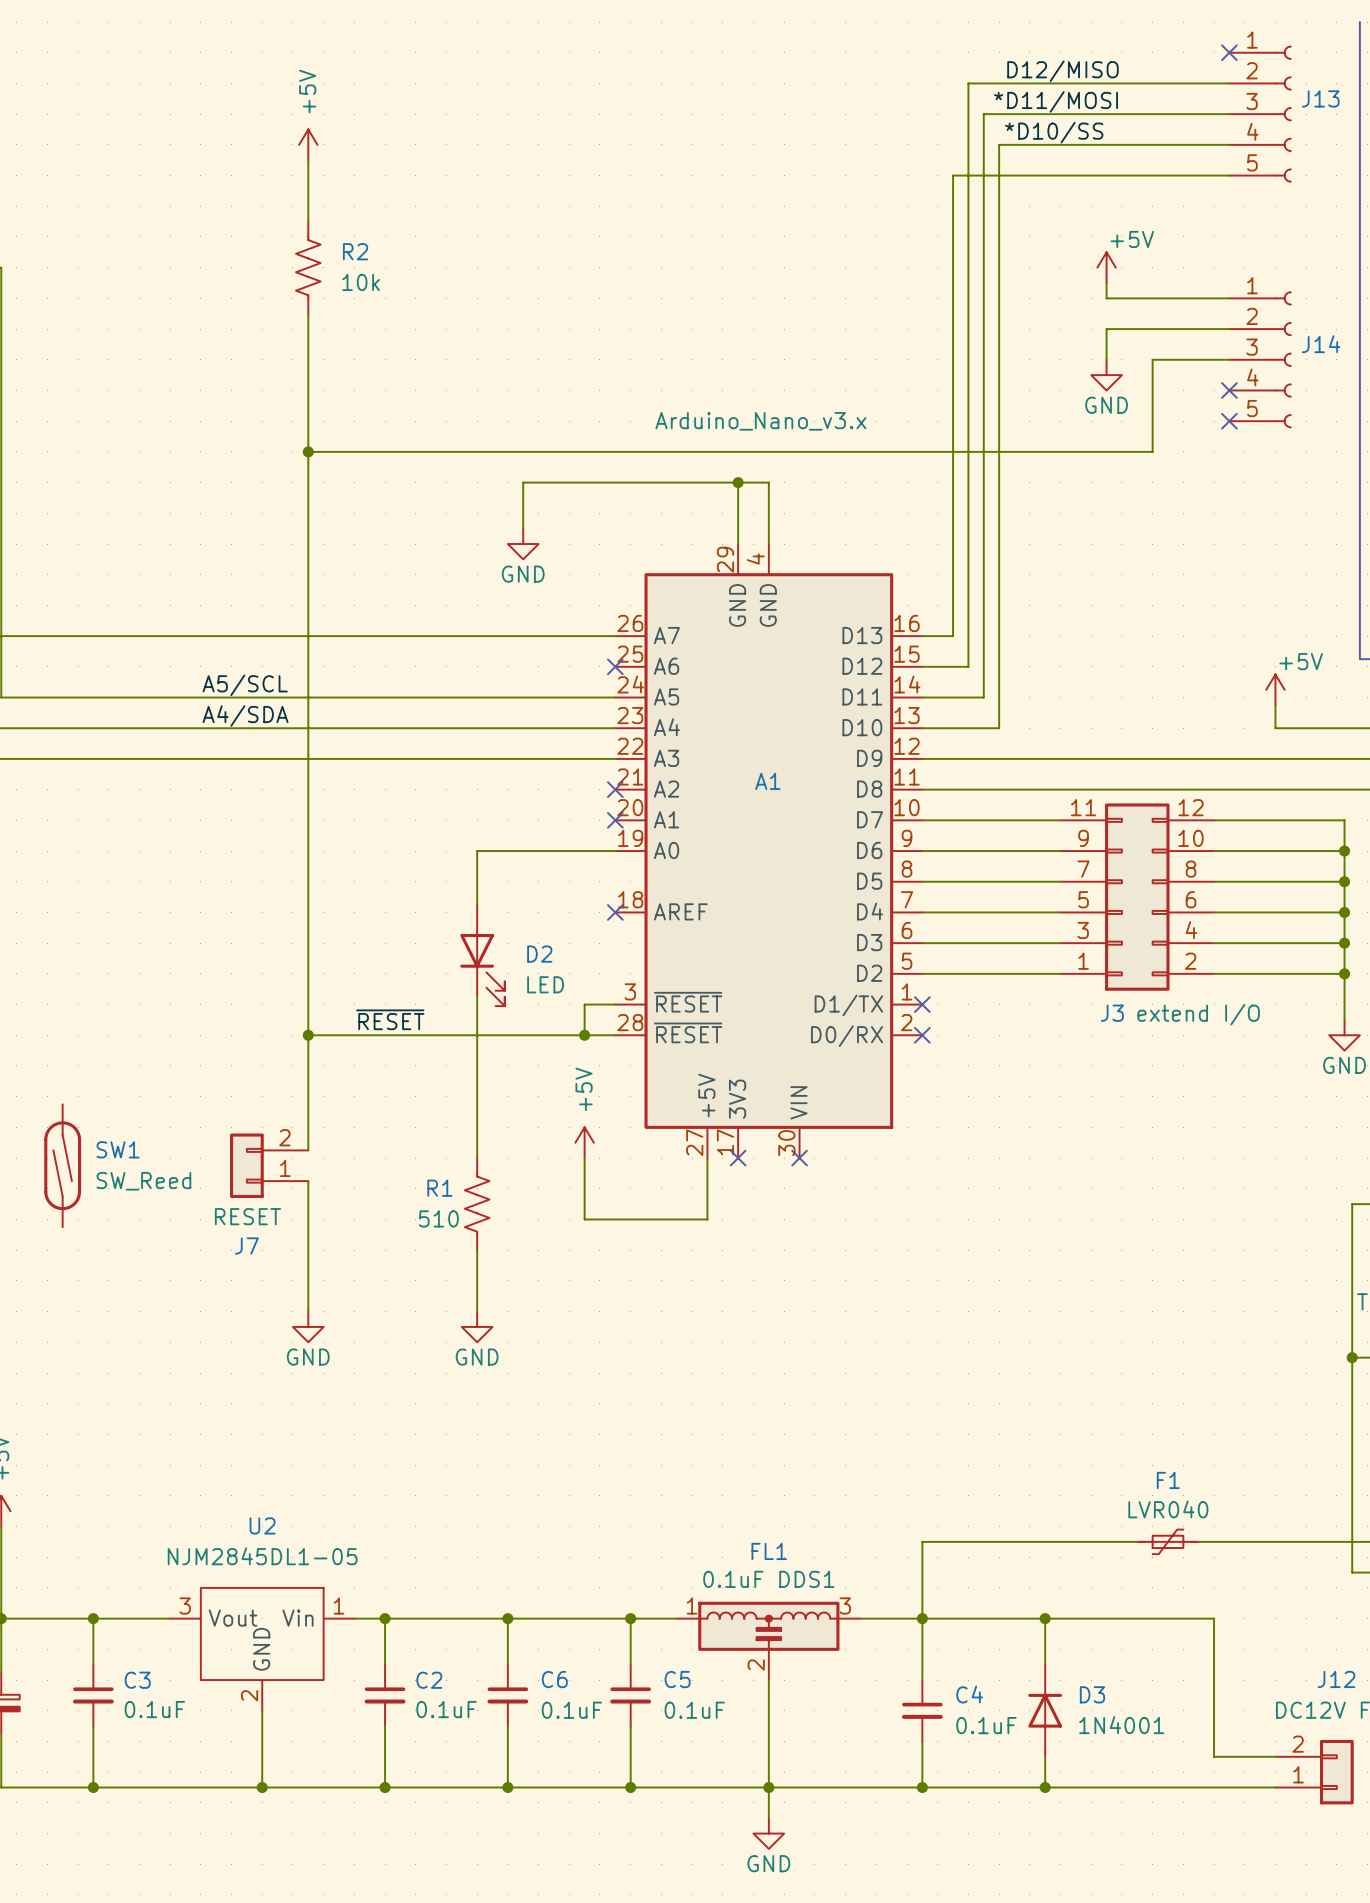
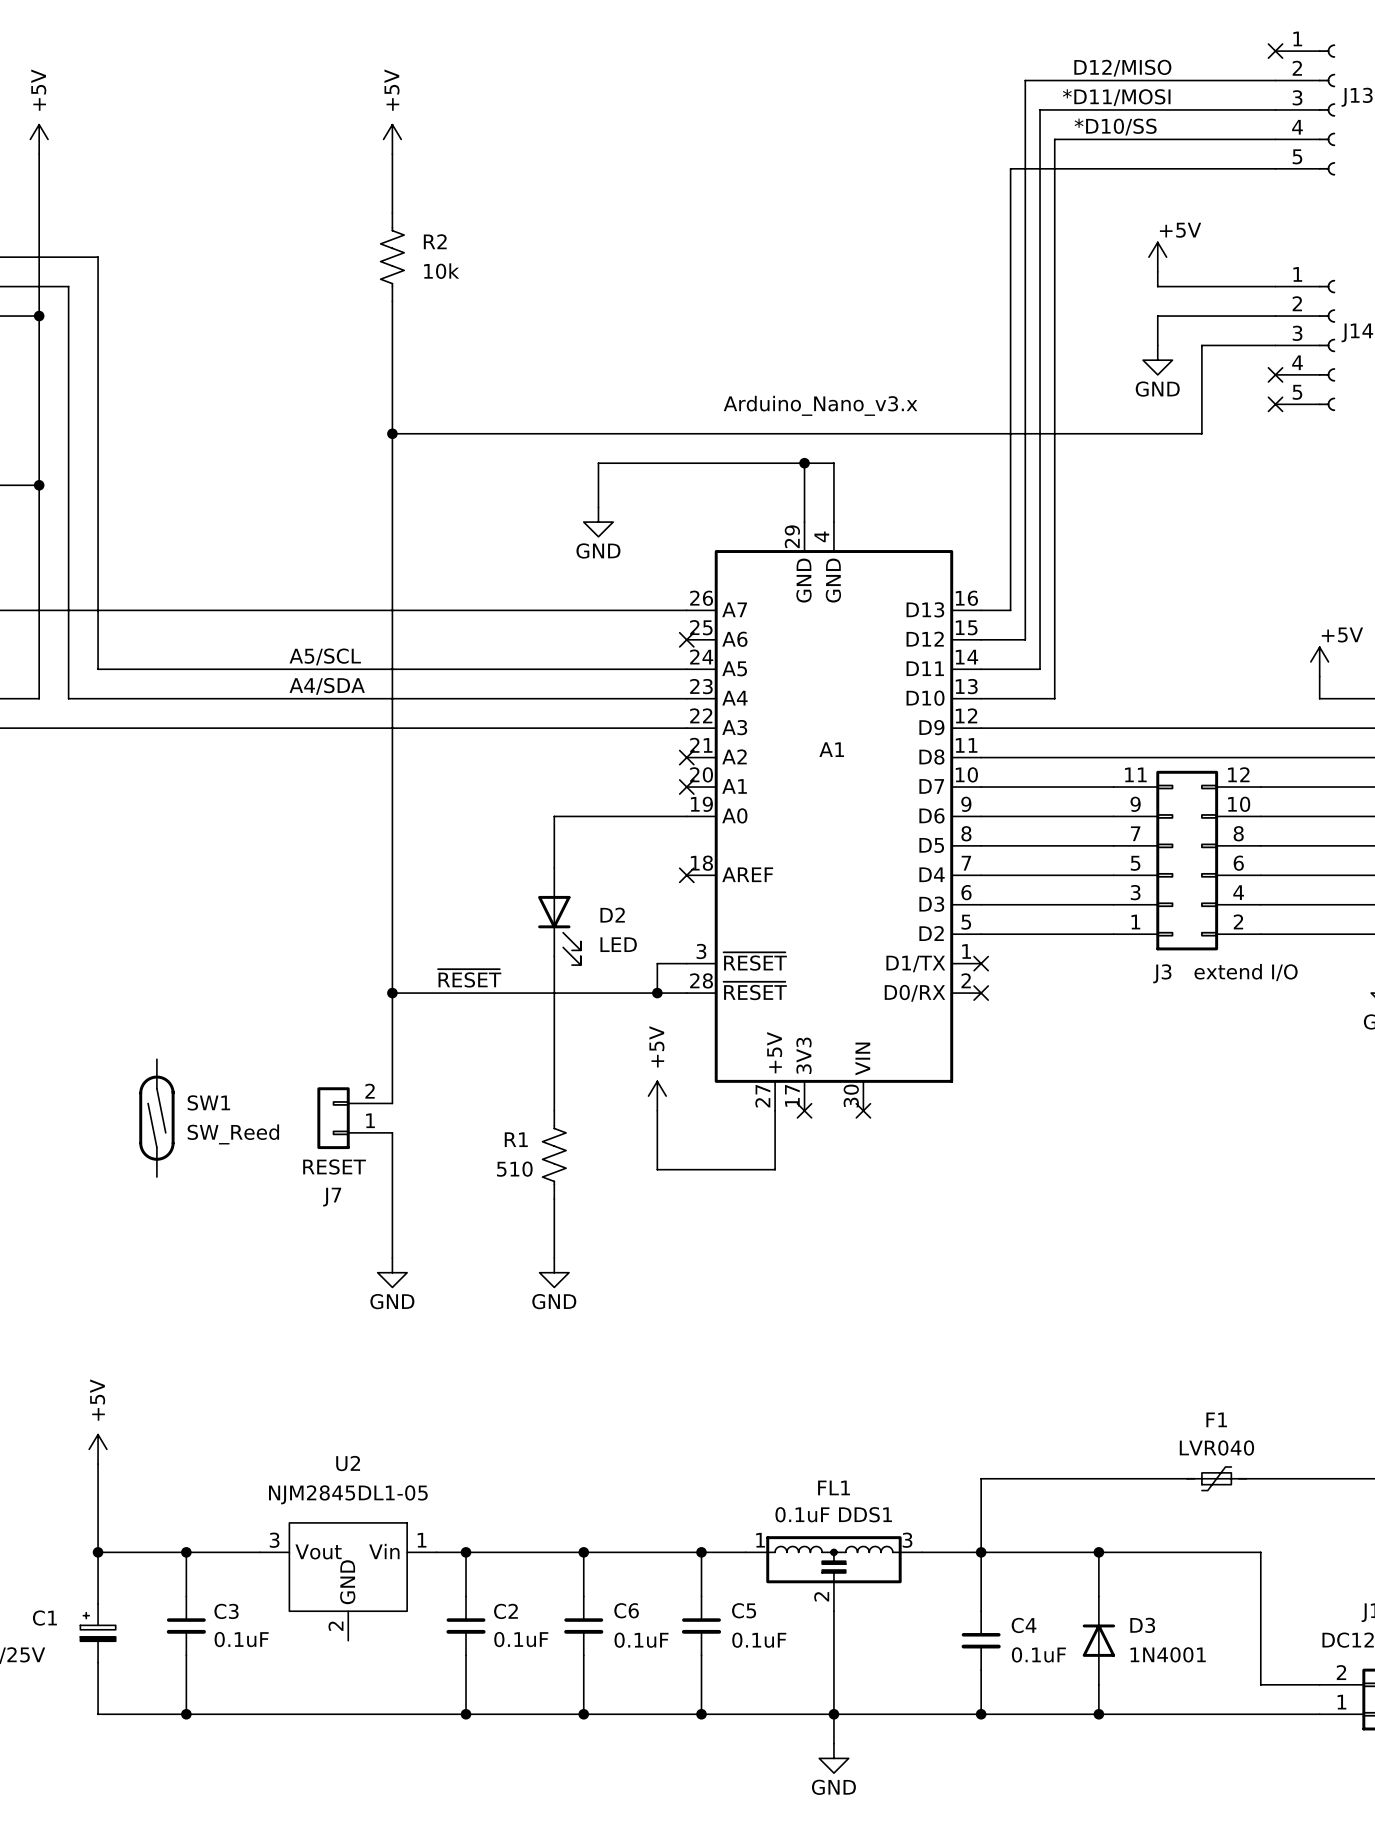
wire: (262, 1710) (262, 1787) -> none
junction: (262, 1787) -> none

